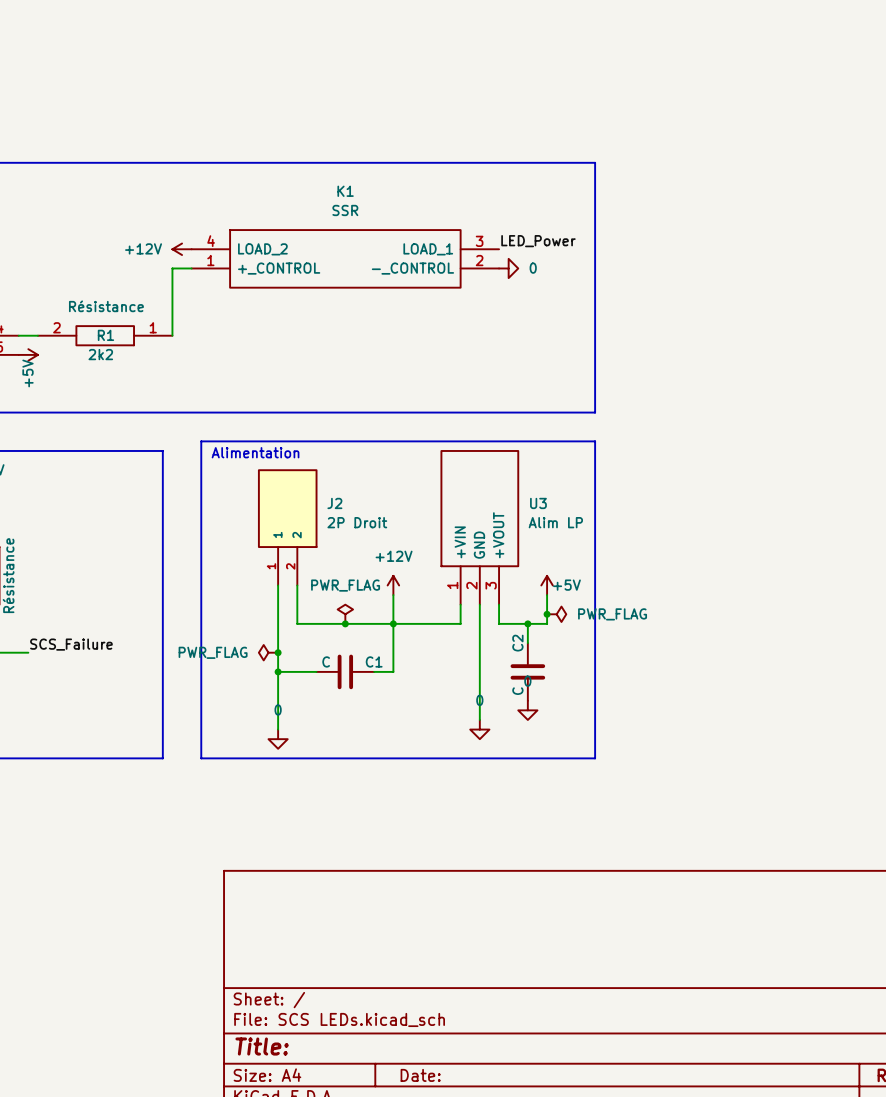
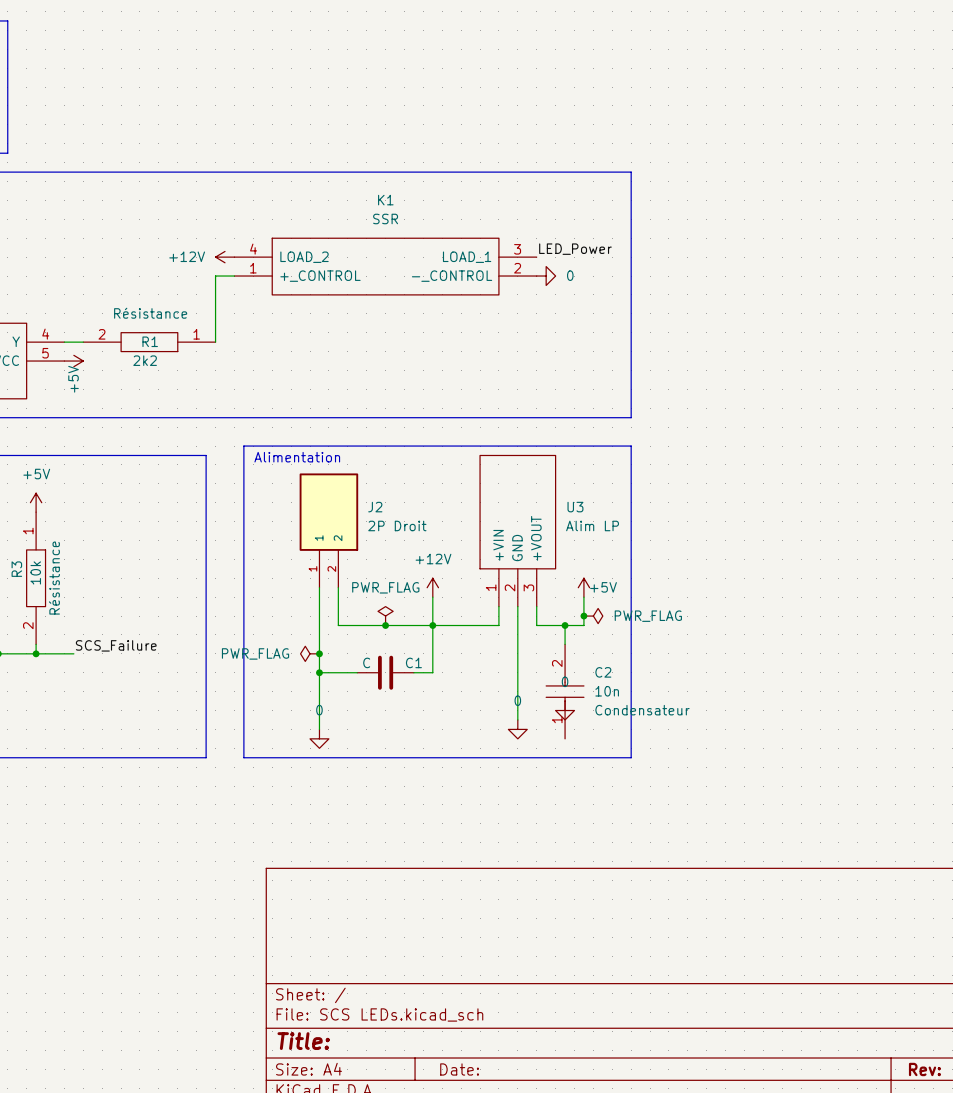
C2 symbol: [510, 643, 546, 701] -> [545, 644, 585, 739]
C2 name position: C2 (517, 643) -> C2 (603, 672)
C2 value: C (517, 691) -> 10n (607, 691)
C2 text: none -> Condensateur (642, 710)

